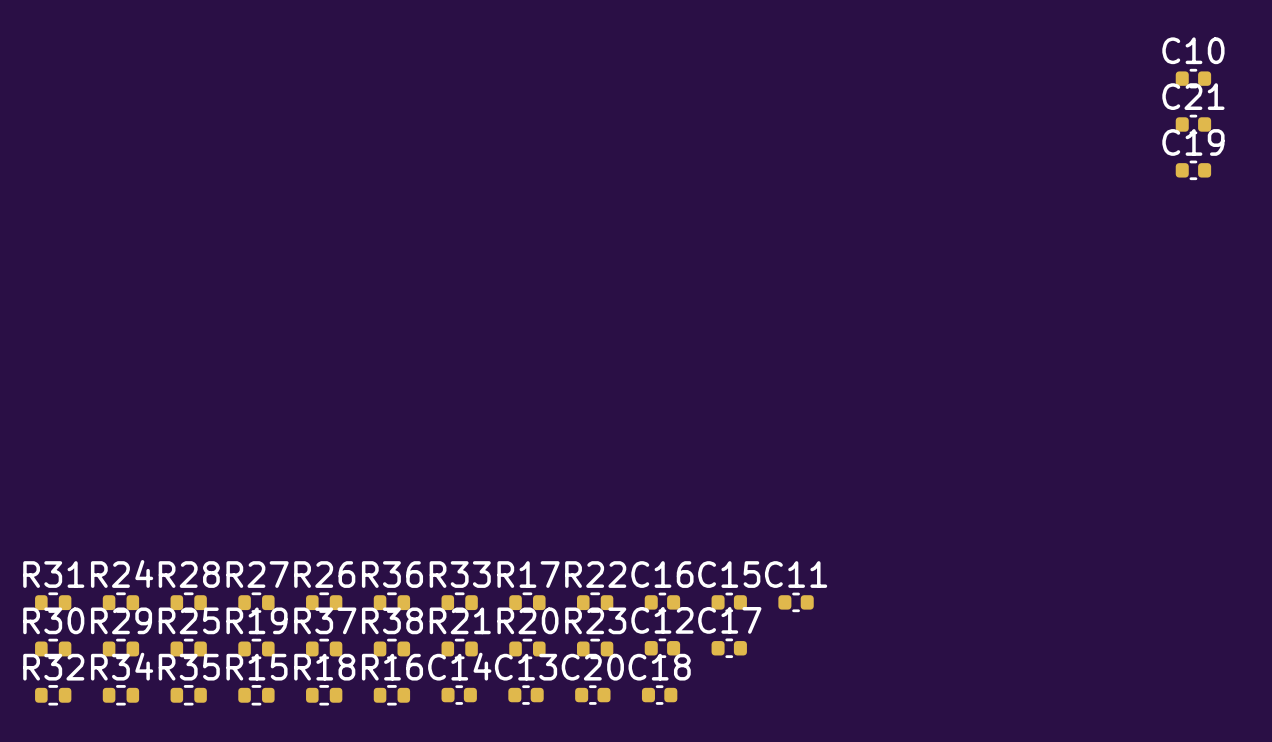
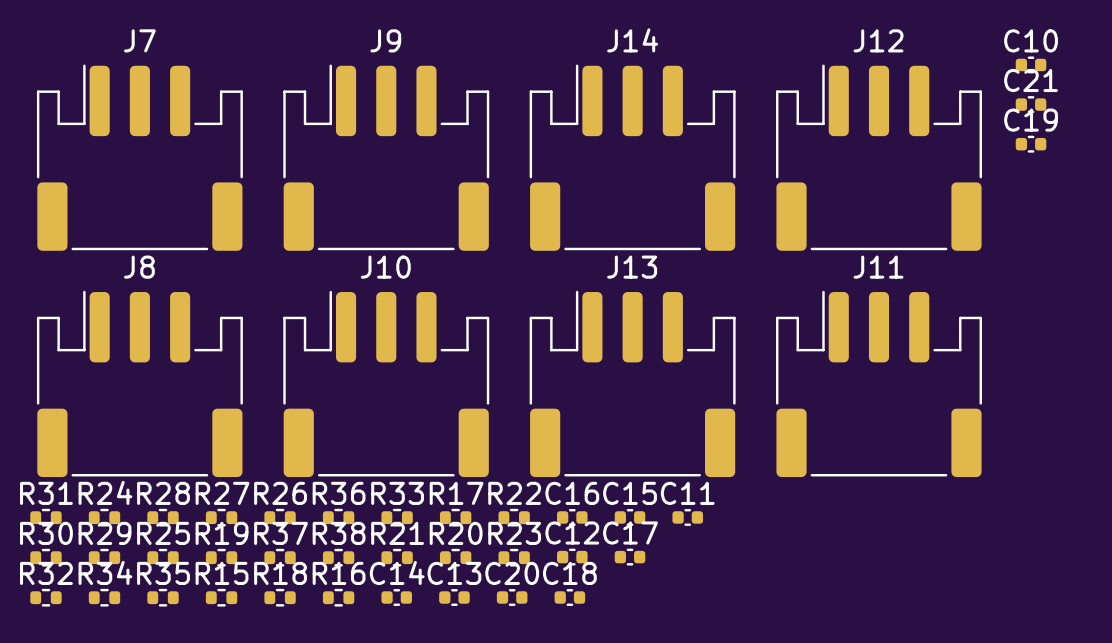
J7: none -> (139, 157)
J9: none -> (386, 157)
J14: none -> (632, 157)
J12: none -> (878, 157)
J8: none -> (139, 383)
J10: none -> (386, 383)
J13: none -> (632, 383)
J11: none -> (878, 383)

